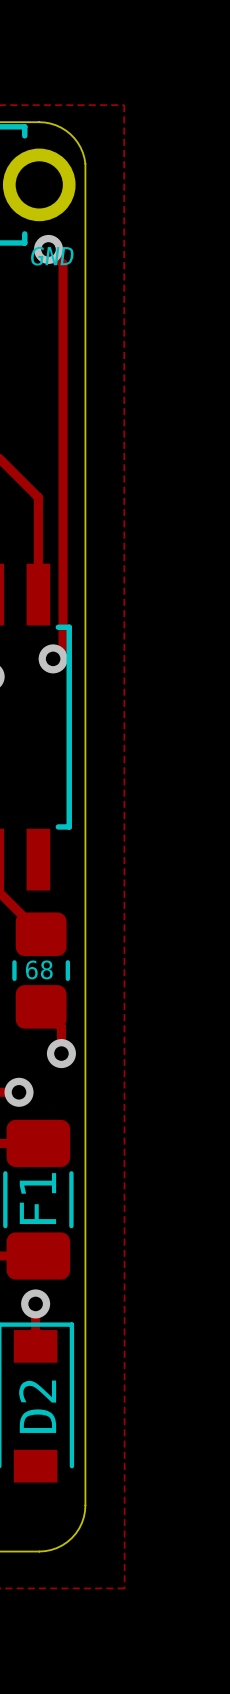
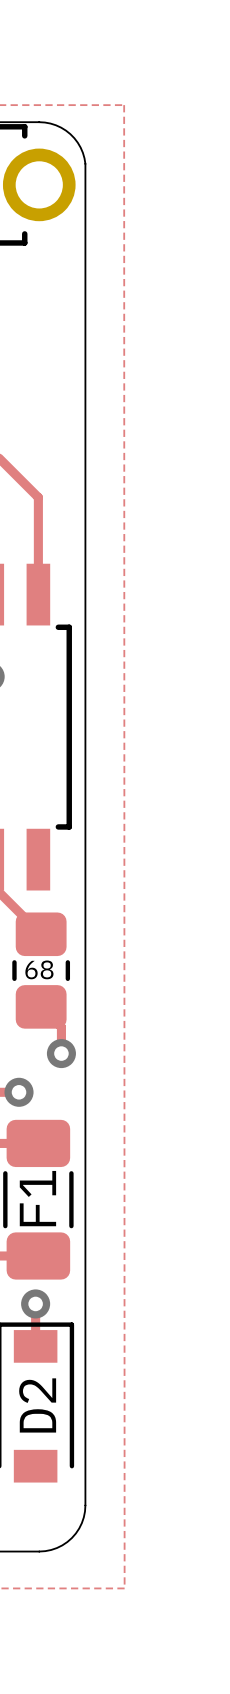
track: (48, 249) (63, 263) (63, 648) (53, 658) -> none
via: (48, 249) -> none
text: GND (52, 256) -> none
via: (53, 658) -> none

